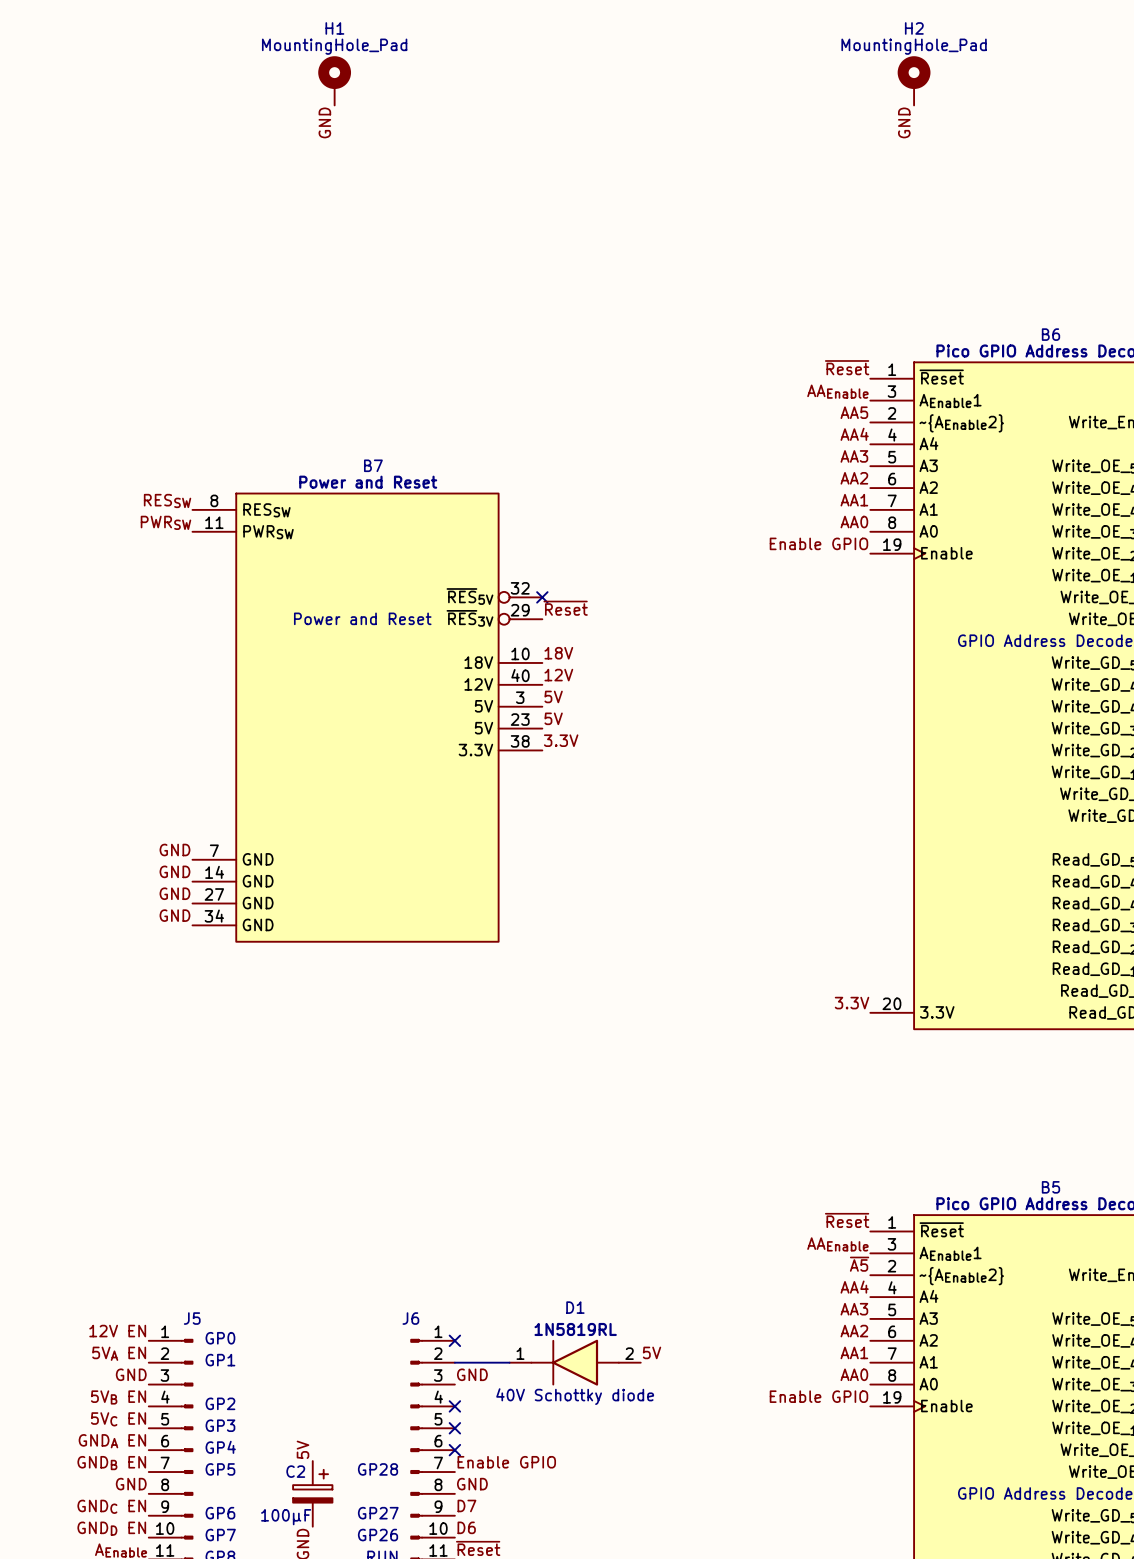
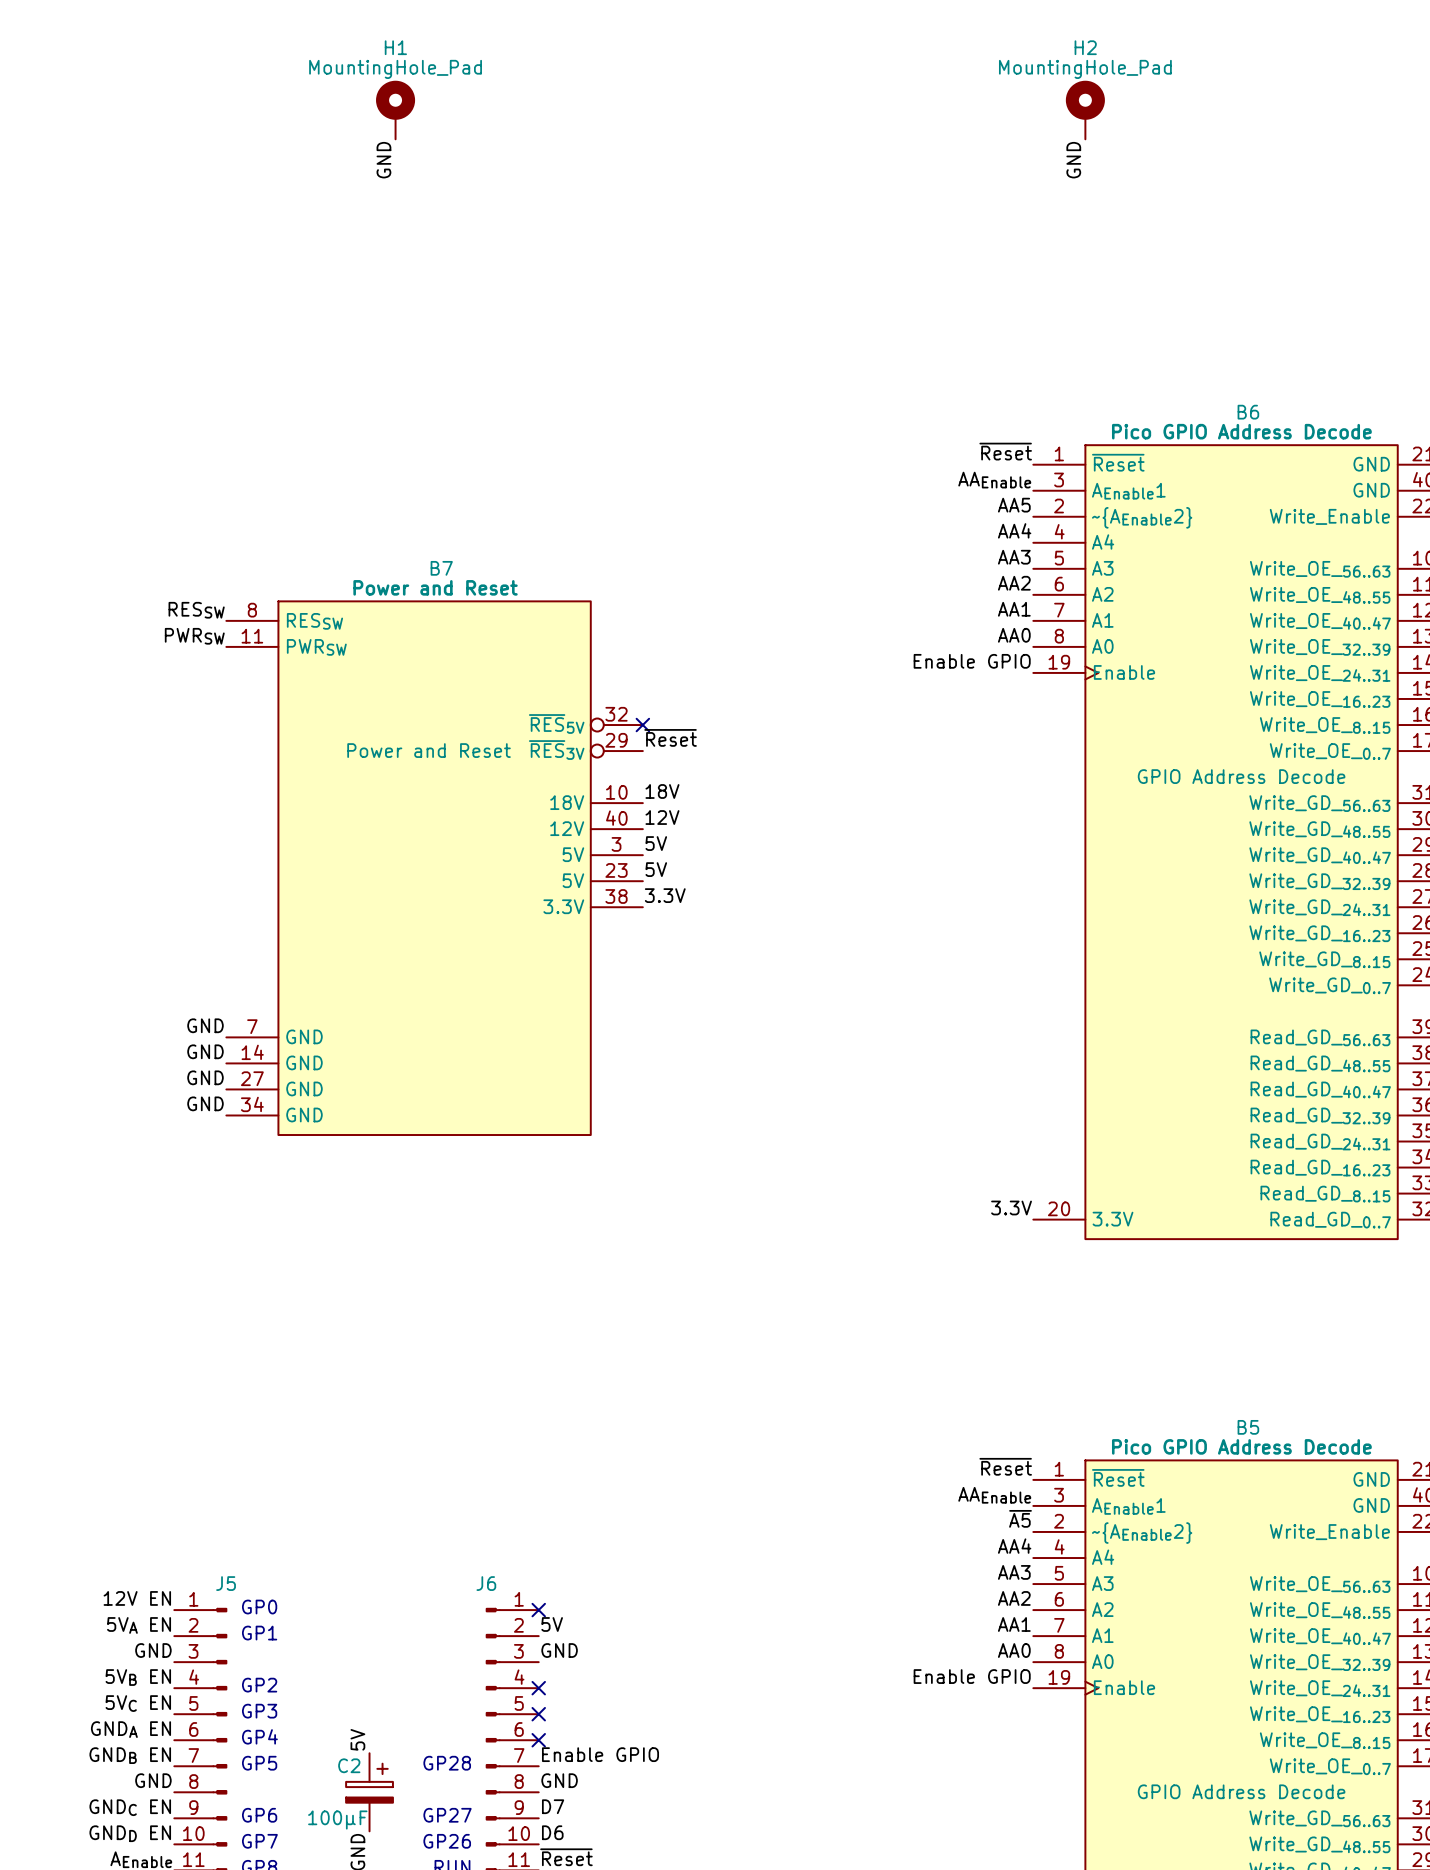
label position: 5V (652, 1352) -> 5V (552, 1624)
wire: (454, 1362) (509, 1362) -> none
D1: 1N5819RL (575, 1362) -> none

